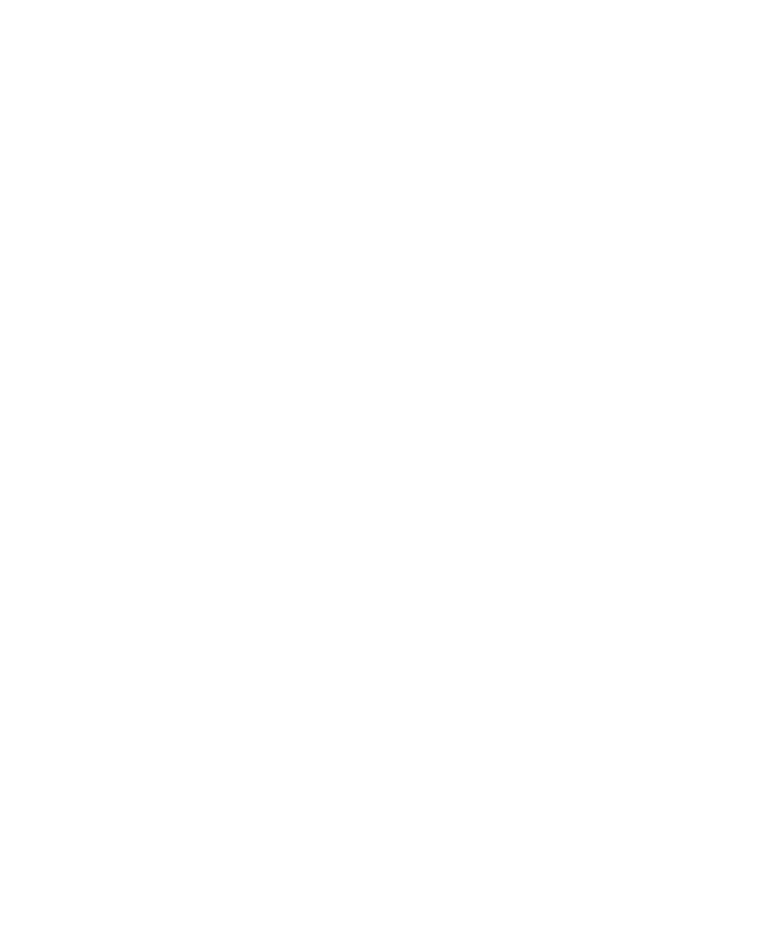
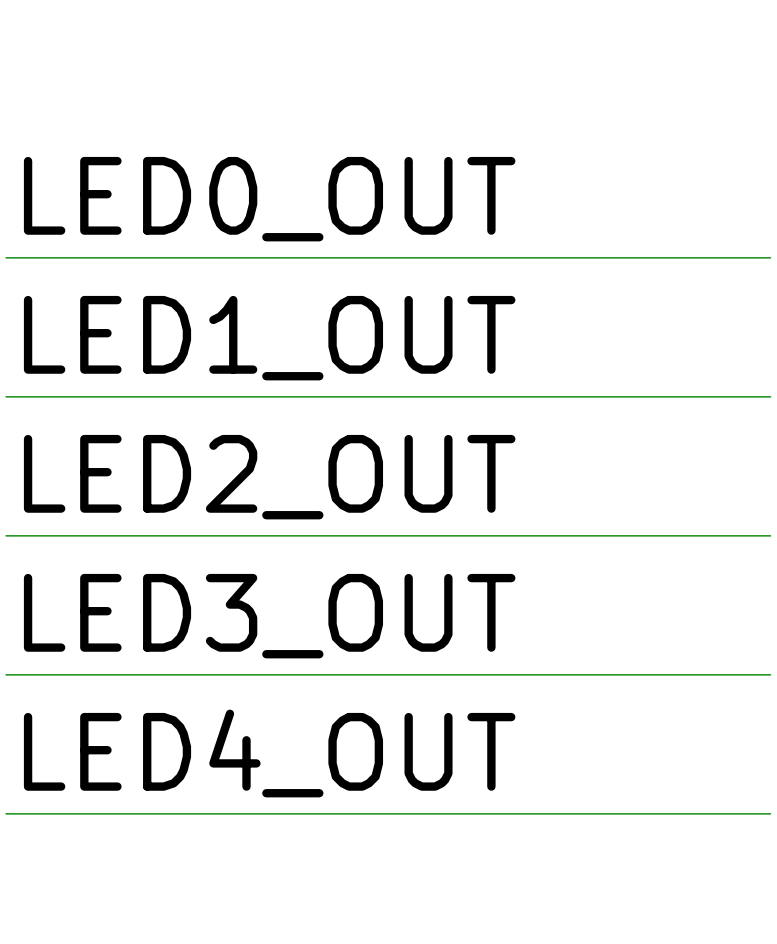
label: none -> LED0_OUT (269, 199)
wire: none -> (6, 257) (770, 257)
label: none -> LED1_OUT (269, 338)
wire: none -> (6, 396) (770, 396)
label: none -> LED2_OUT (269, 477)
wire: none -> (6, 535) (770, 535)
label: none -> LED3_OUT (269, 616)
wire: none -> (6, 674) (770, 674)
label: none -> LED4_OUT (269, 753)
wire: none -> (6, 813) (770, 813)

